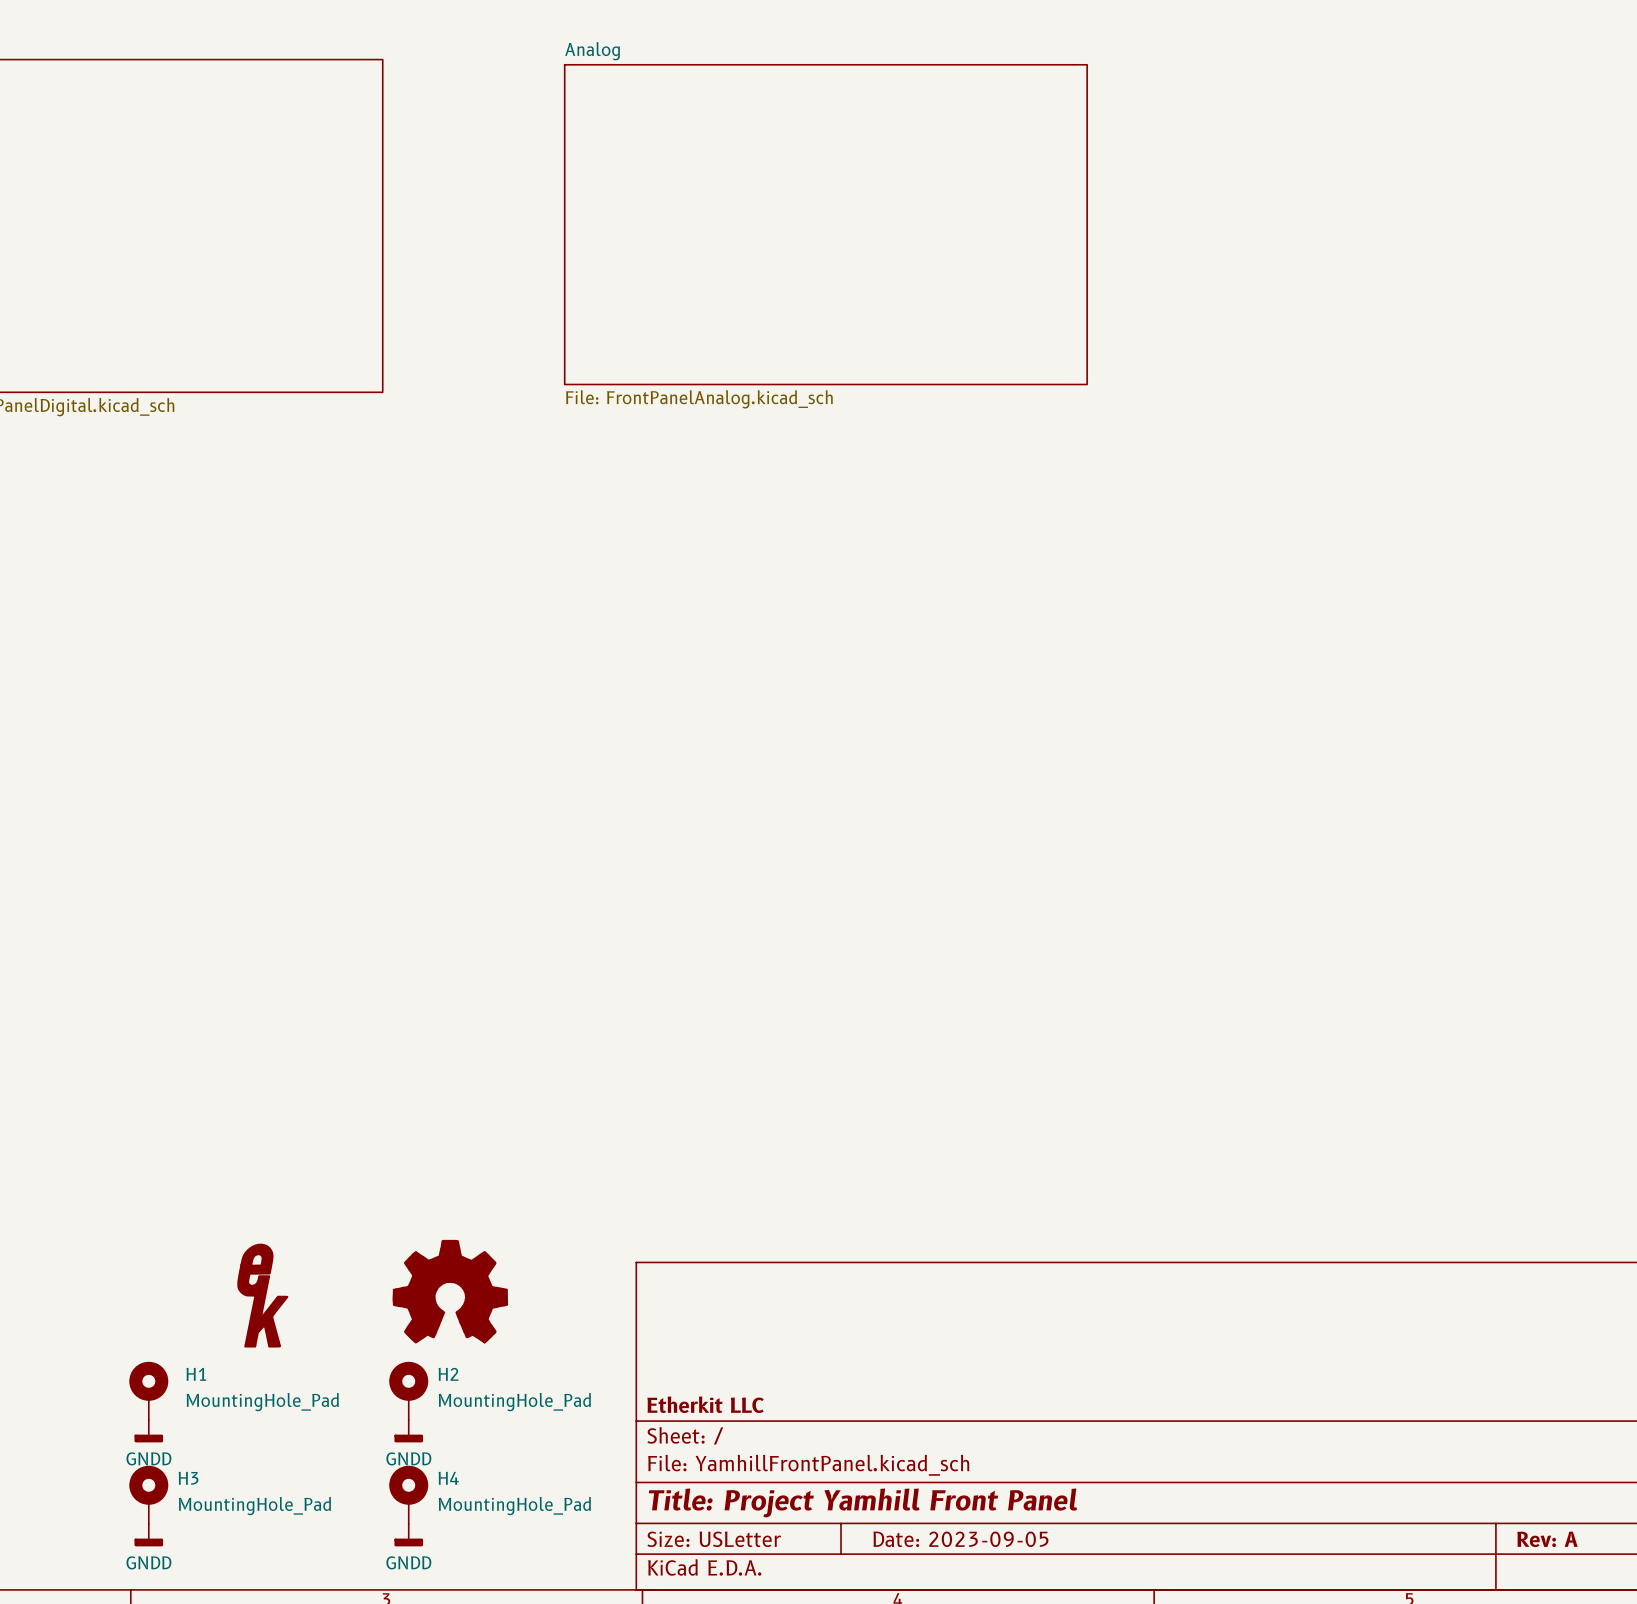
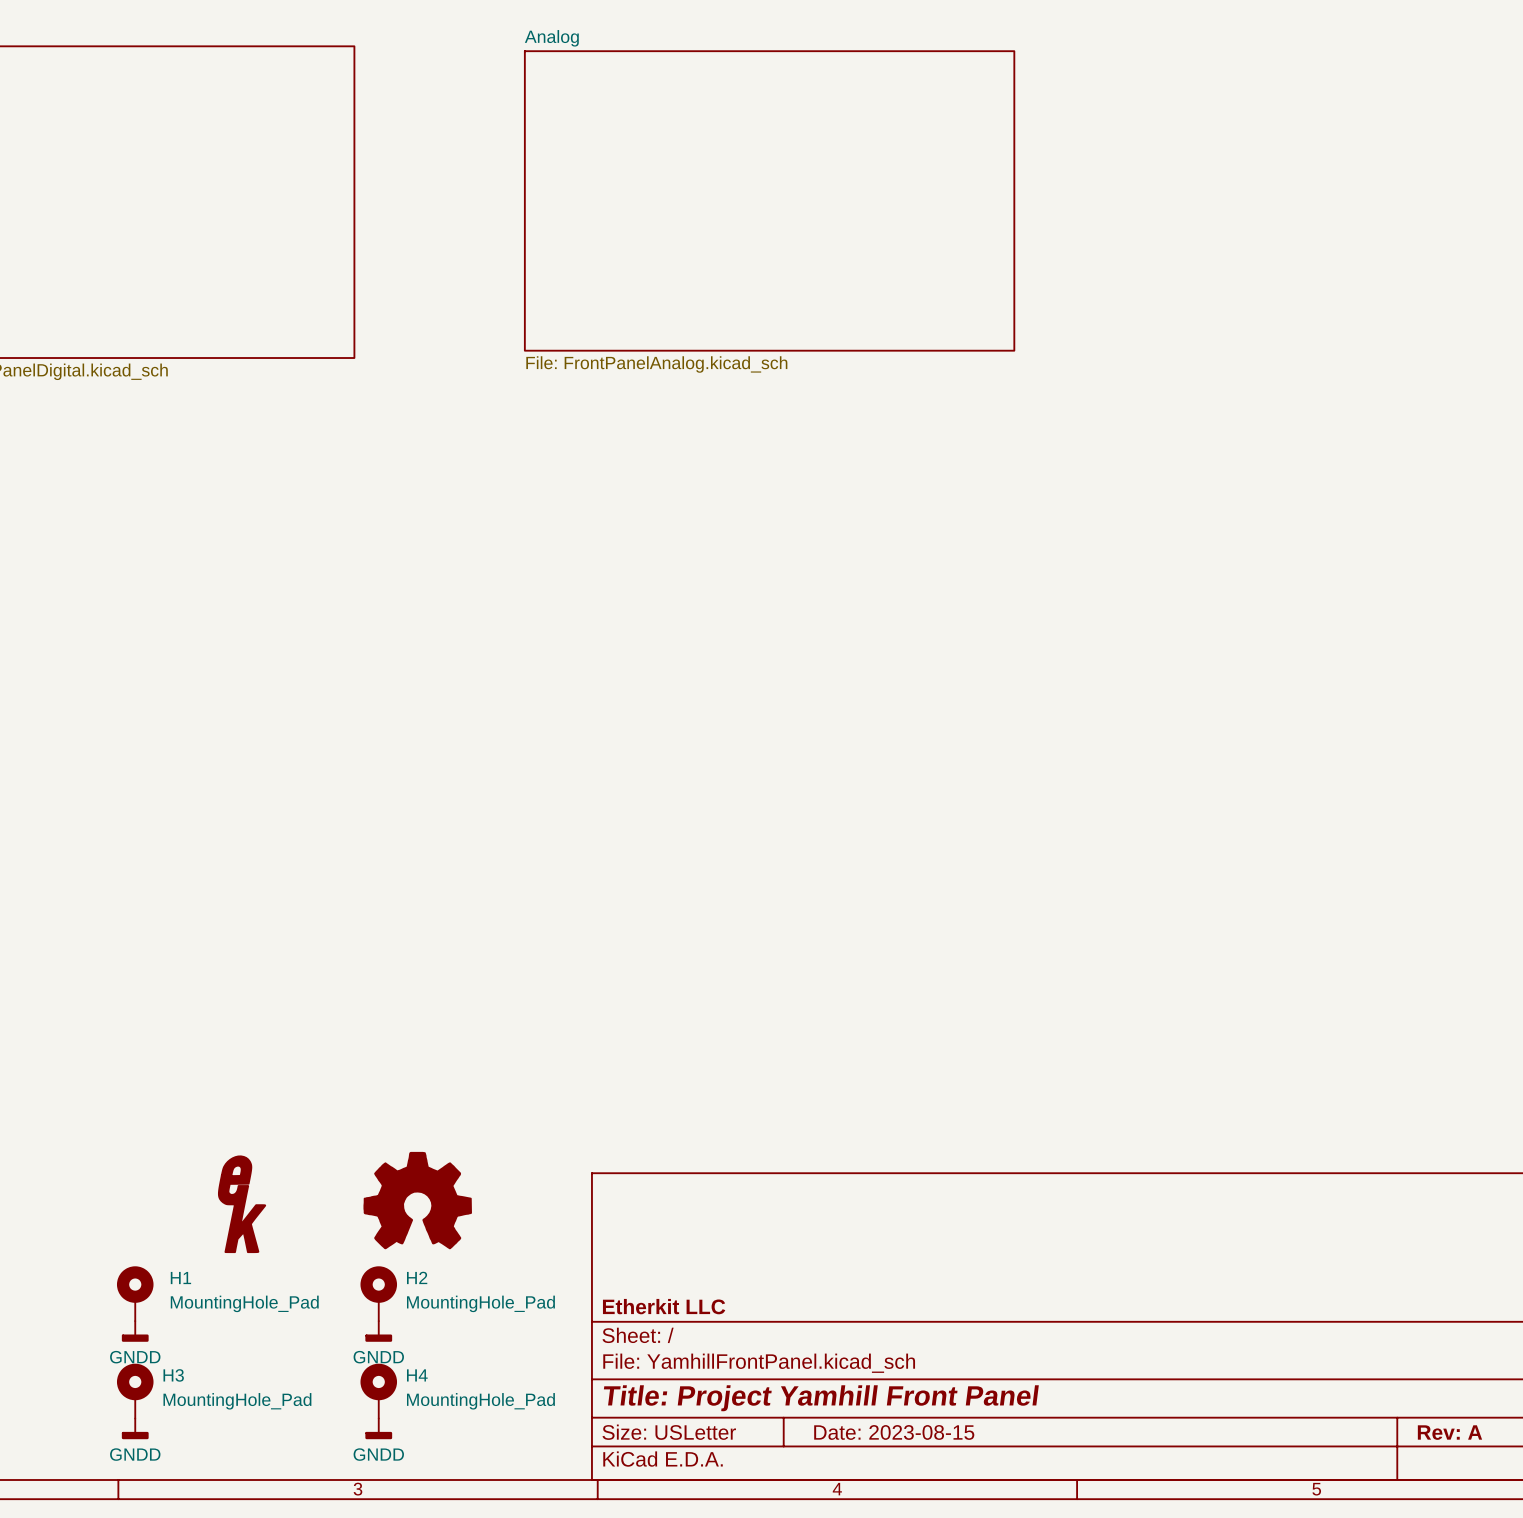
title block: Date: 2023-09-05 (960, 1539) -> Date: 2023-08-15 (894, 1432)

